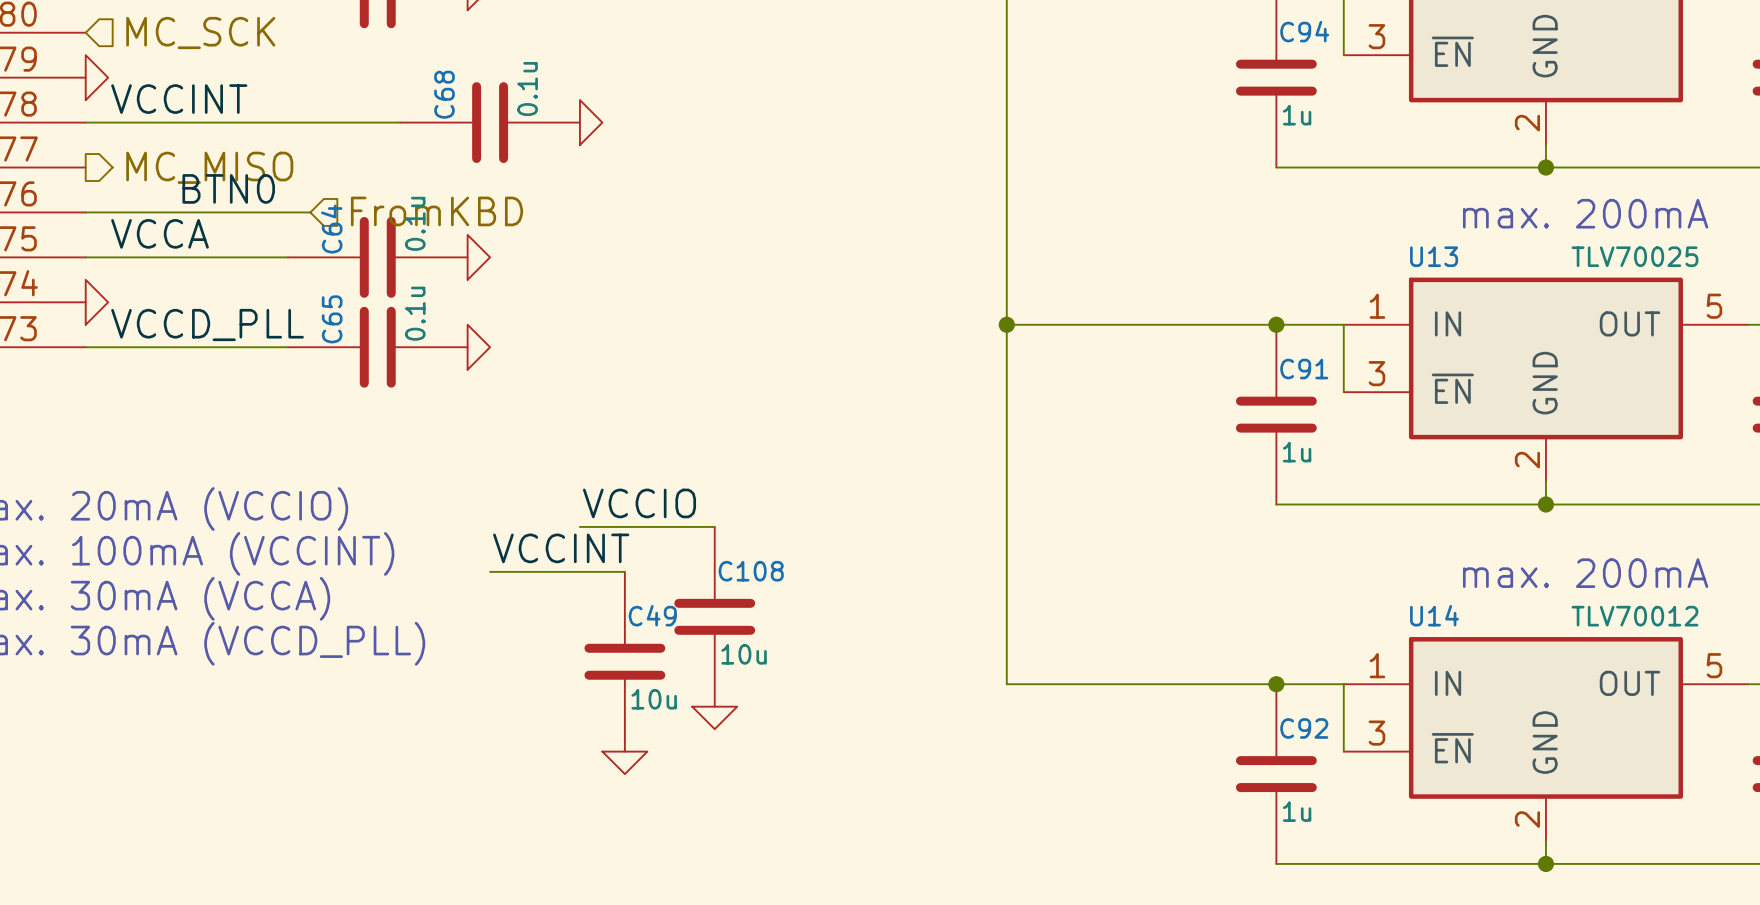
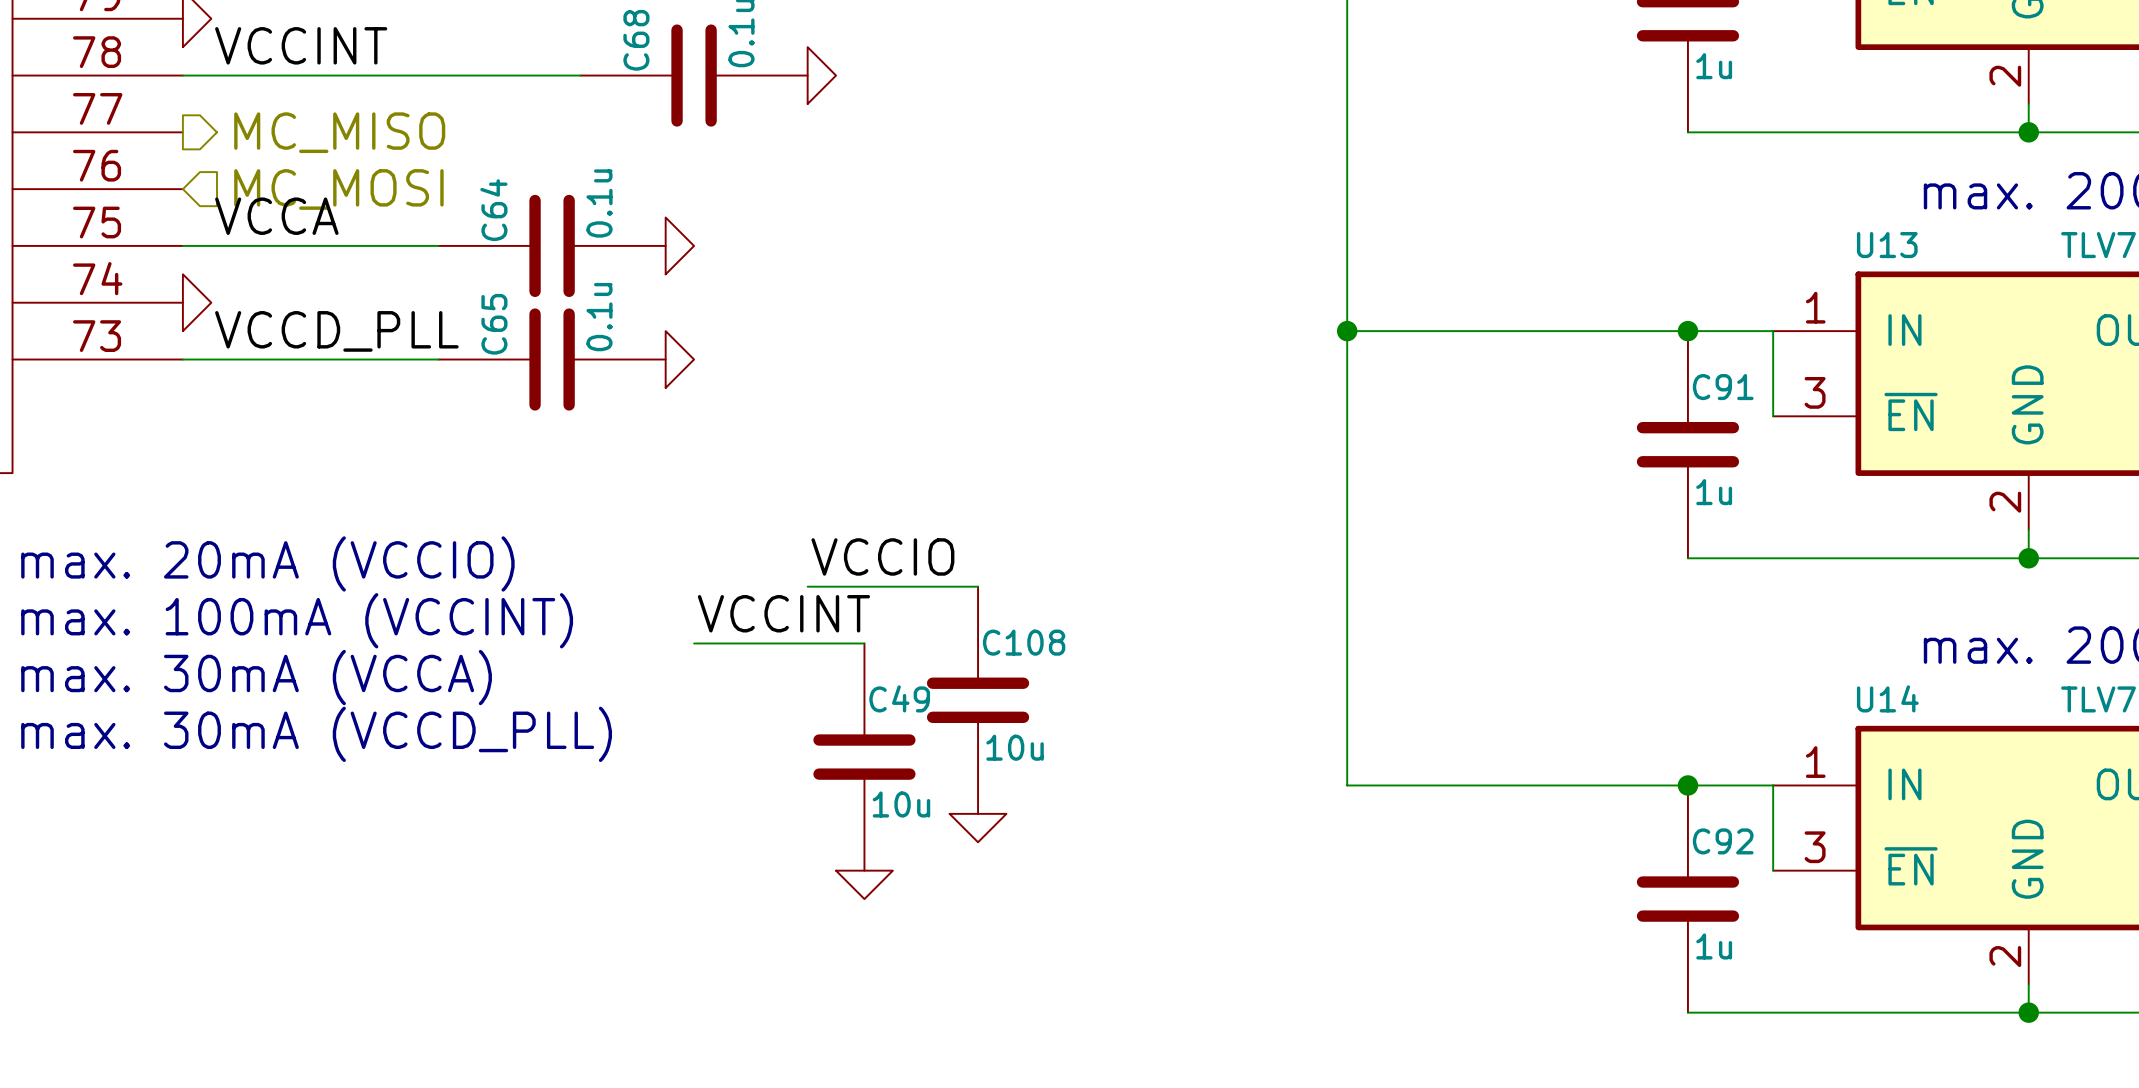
label: BTN0 (228, 188) -> none
hierarchical label: FromKBD (436, 211) -> none
wire: (85, 212) (310, 212) -> none
hierarchical label: none -> MC_MOSI (338, 189)

